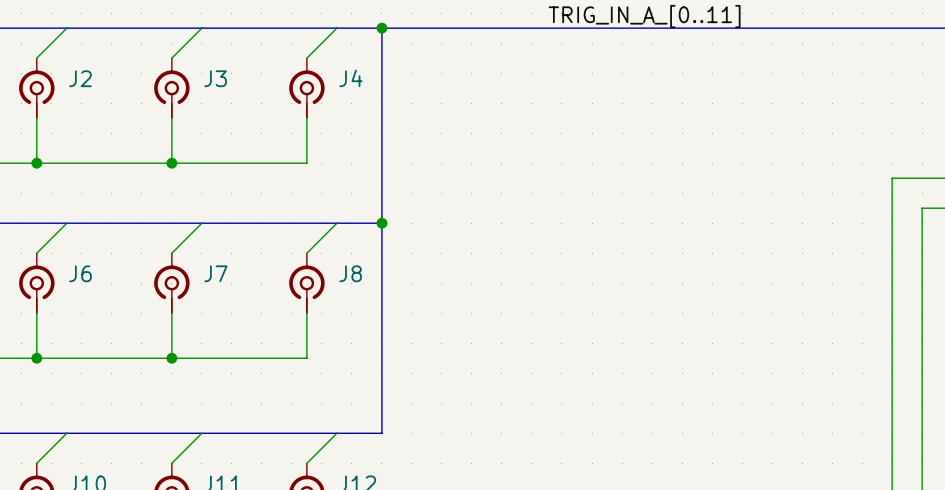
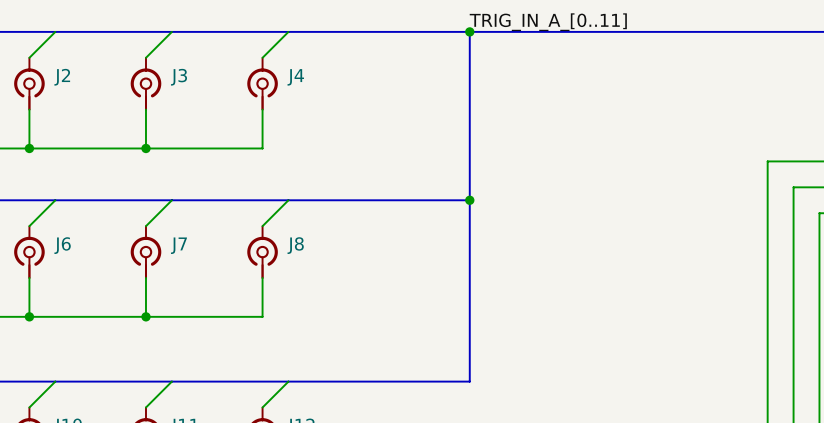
bus: (381, 28) (381, 433) -> (469, 31) (469, 381) (327, 381)
junction: (381, 28) -> none
junction: none -> (469, 31)
bus: none -> (327, 200) (469, 200)
junction: (381, 223) -> none
junction: none -> (469, 200)

